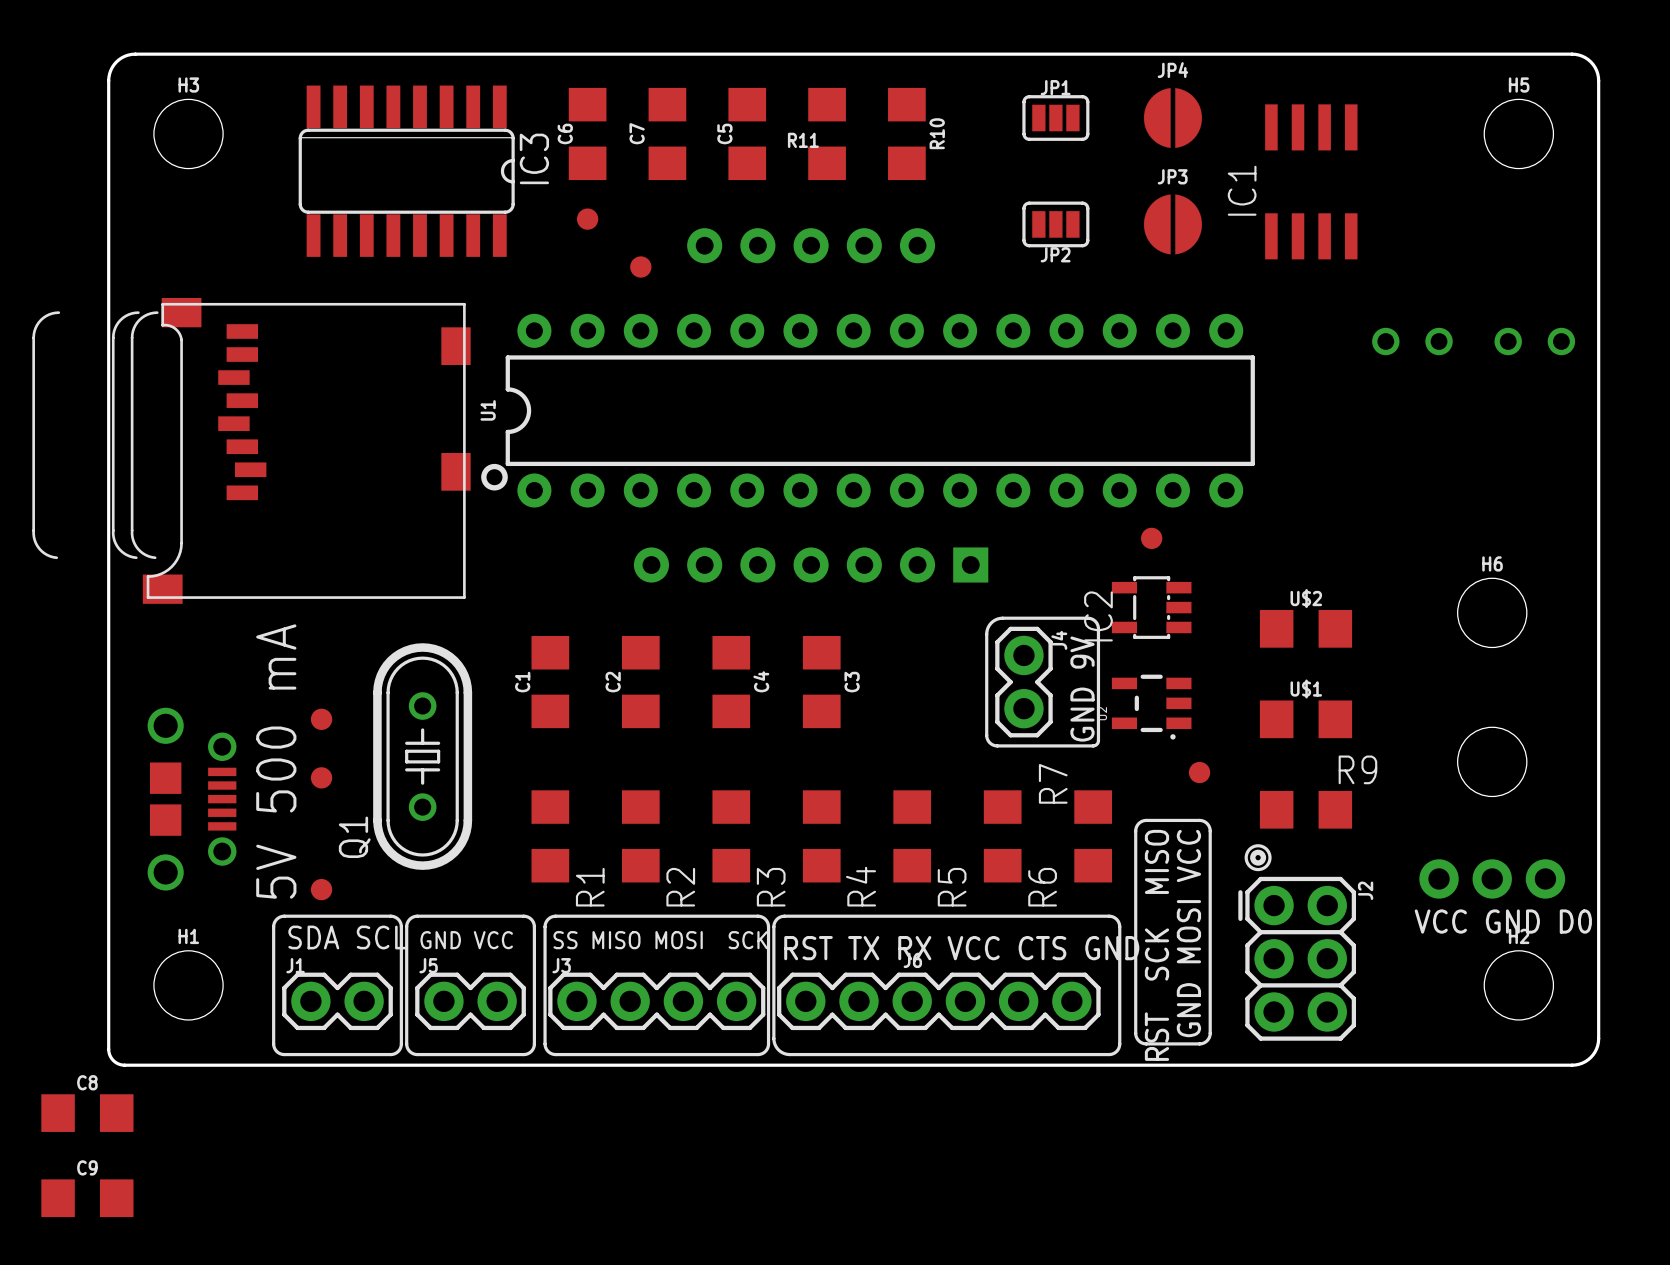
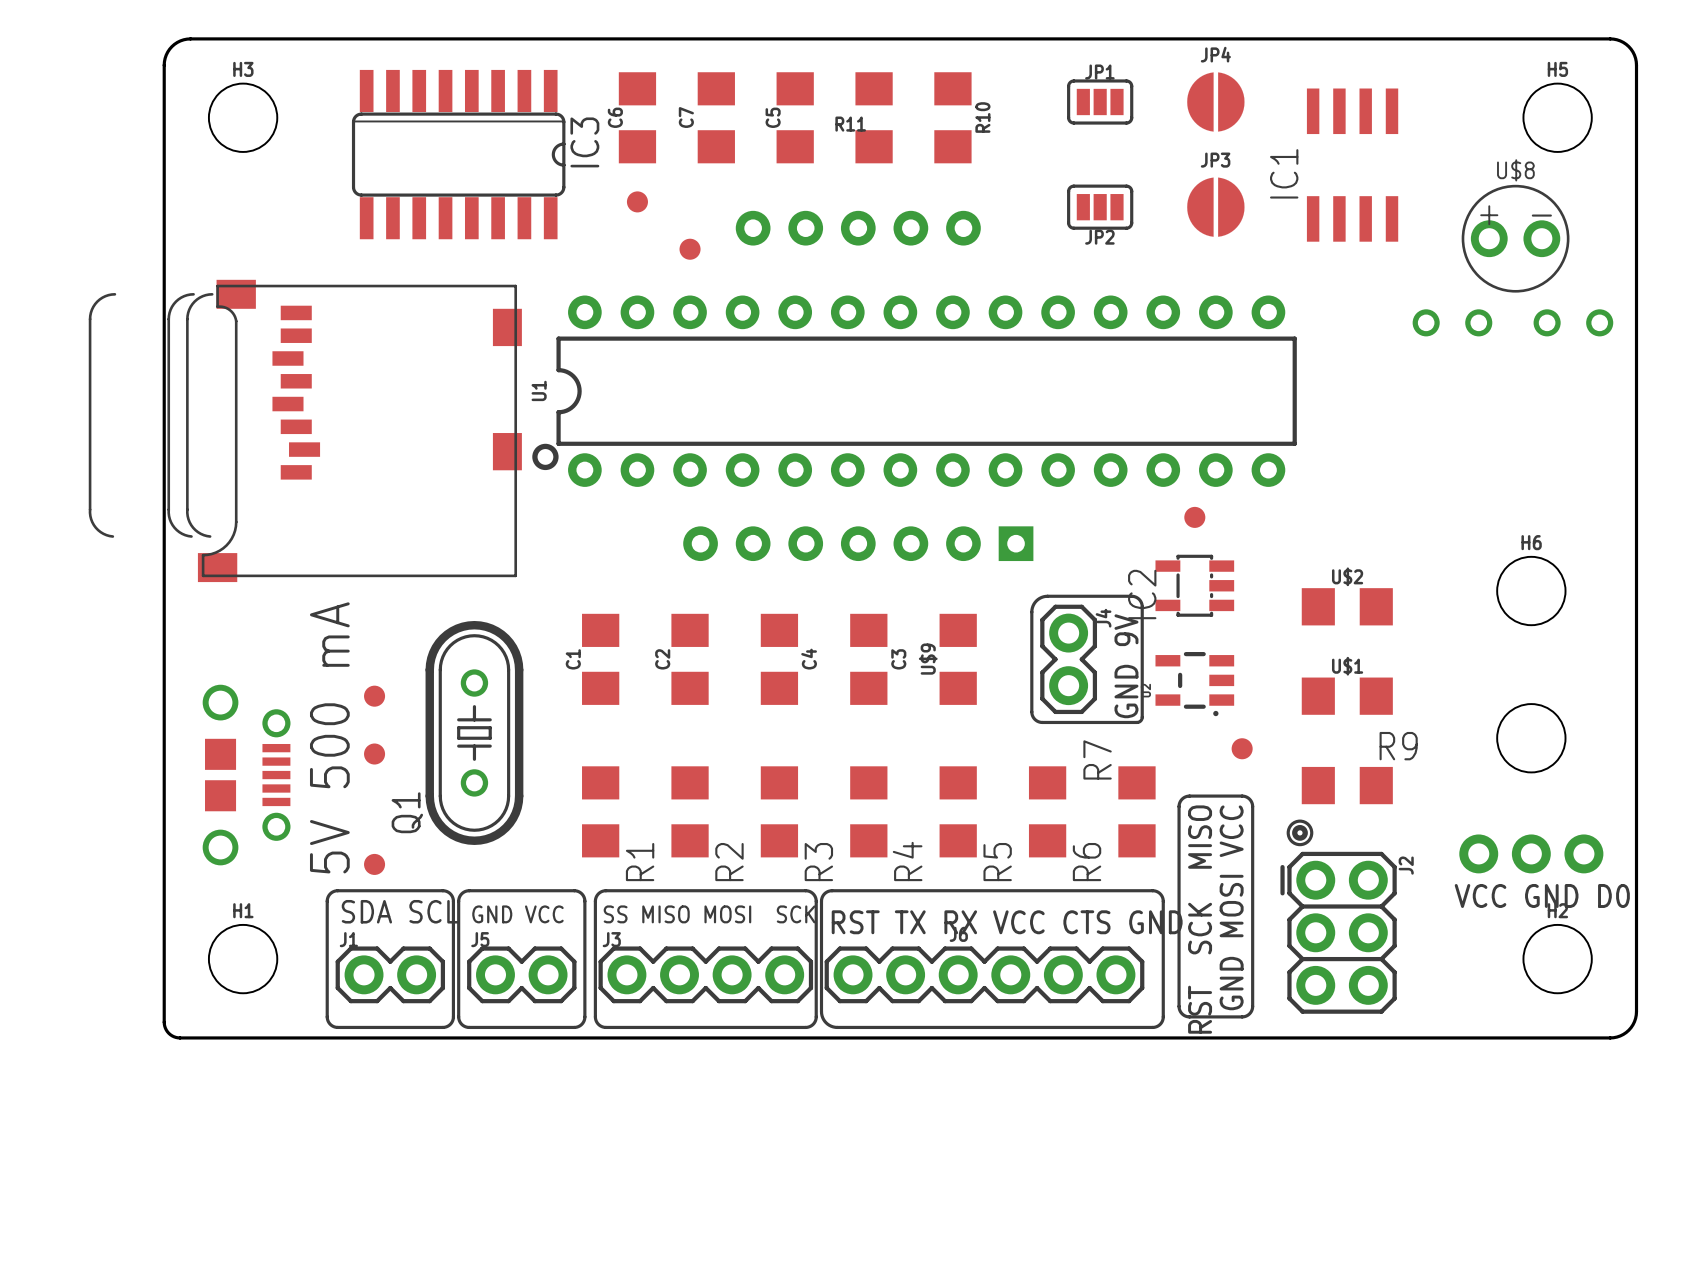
U$8: none -> (1515, 238)
U$9: none -> (958, 659)
C8: (87, 1113) -> none
C9: (87, 1198) -> none

